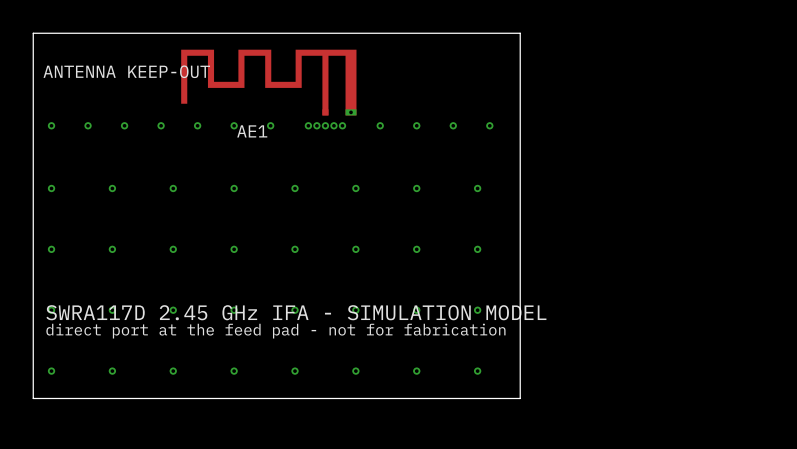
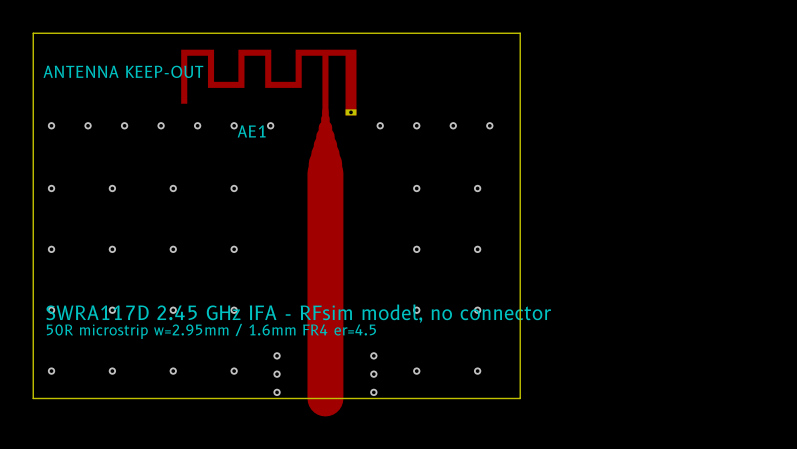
track: none -> (325, 112) (325, 398)
via: (308, 125) -> none
via: (316, 125) -> none
via: (325, 125) -> none
via: (333, 125) -> none
via: (342, 125) -> none
via: (295, 188) -> none
via: (355, 188) -> none
via: (295, 249) -> none
via: (355, 249) -> none
via: (295, 310) -> none
via: (355, 310) -> none
text: SWRA117D 2.45 GHz IFA - SIMULATION MODEL (296, 312) -> SWRA117D 2.45 GHz IFA - RFsim model, no connector (298, 313)
text: direct port at the feed pad - not for fabrication (275, 331) -> 50R microstrip w=2.95mm / 1.6mm FR4 er=4.5 (211, 331)
via: none -> (277, 355)
via: none -> (373, 355)
via: (295, 371) -> none
via: (355, 371) -> none
via: none -> (277, 374)
via: none -> (373, 374)
via: none -> (277, 392)
via: none -> (373, 392)

